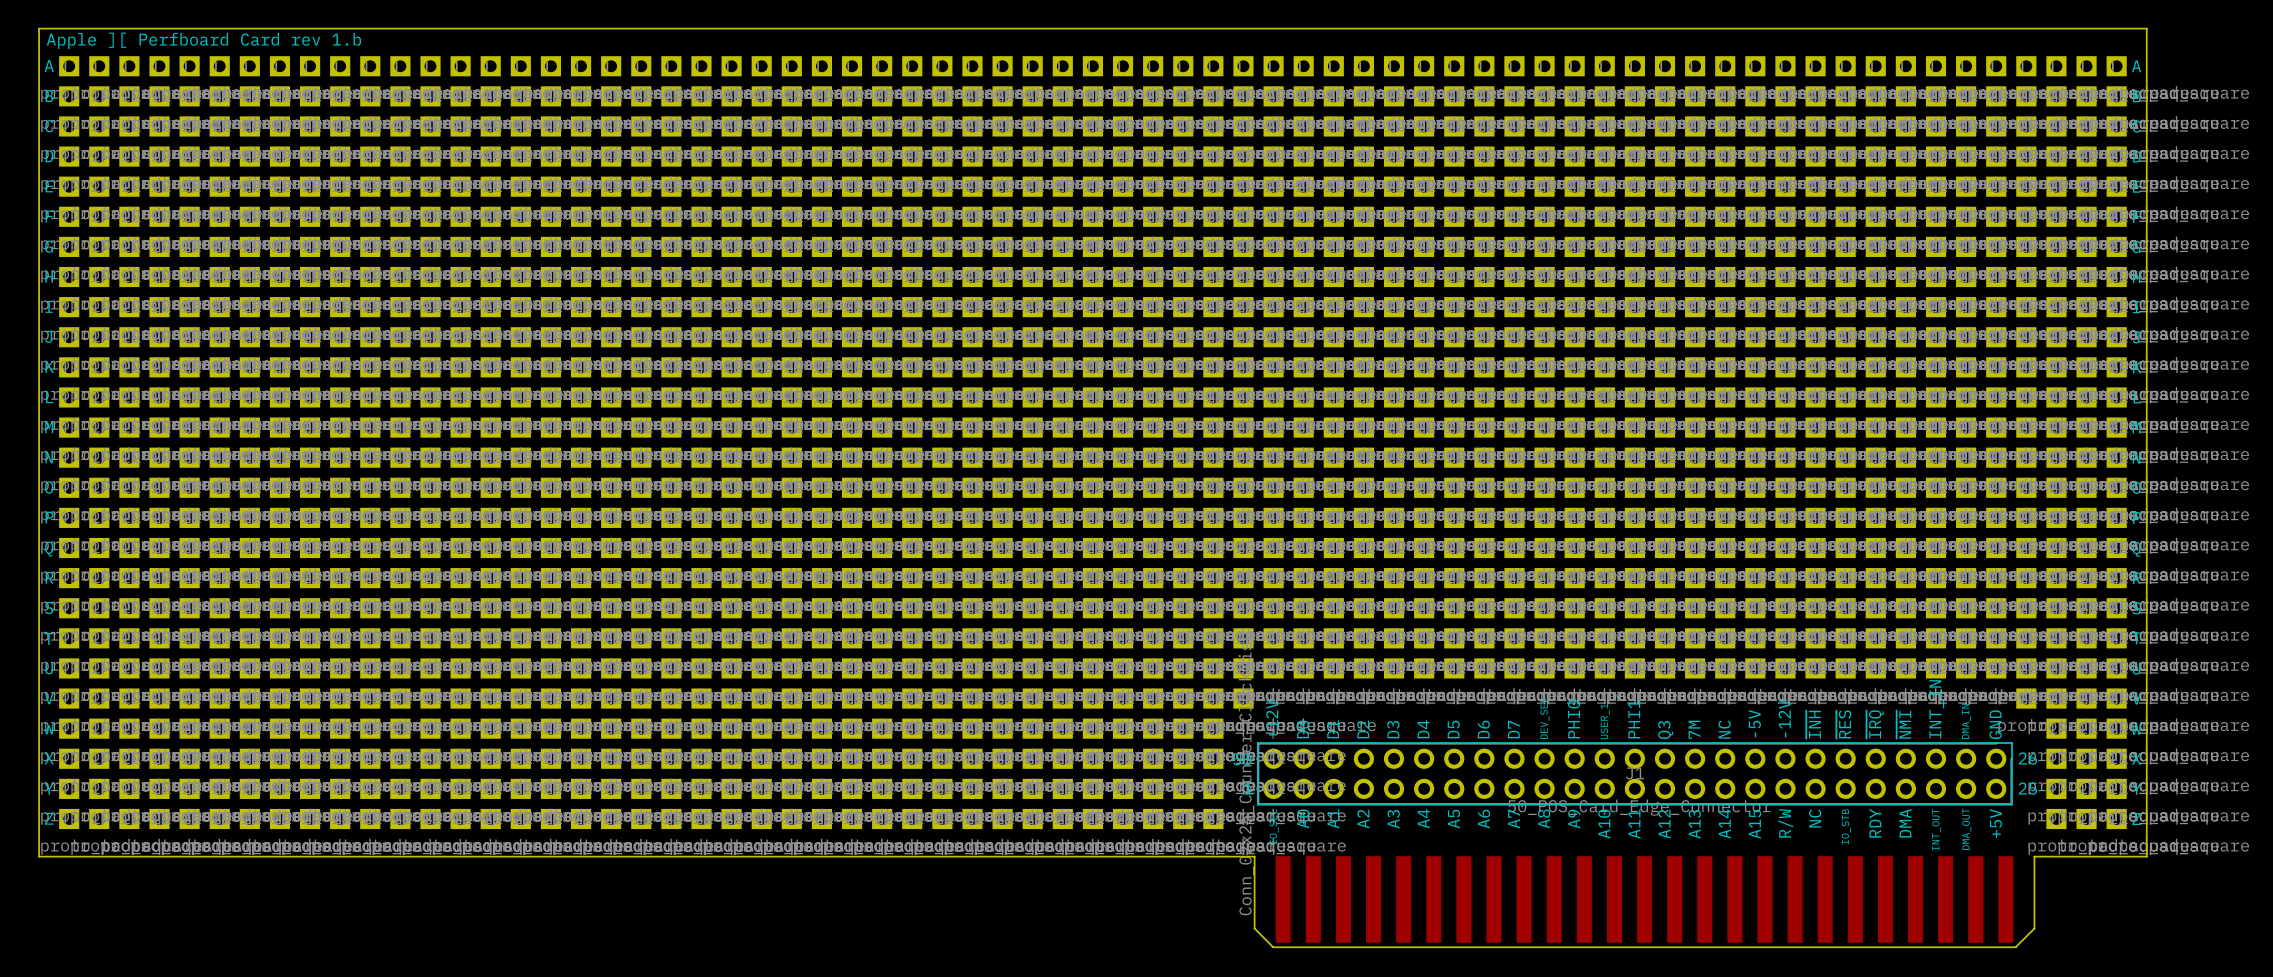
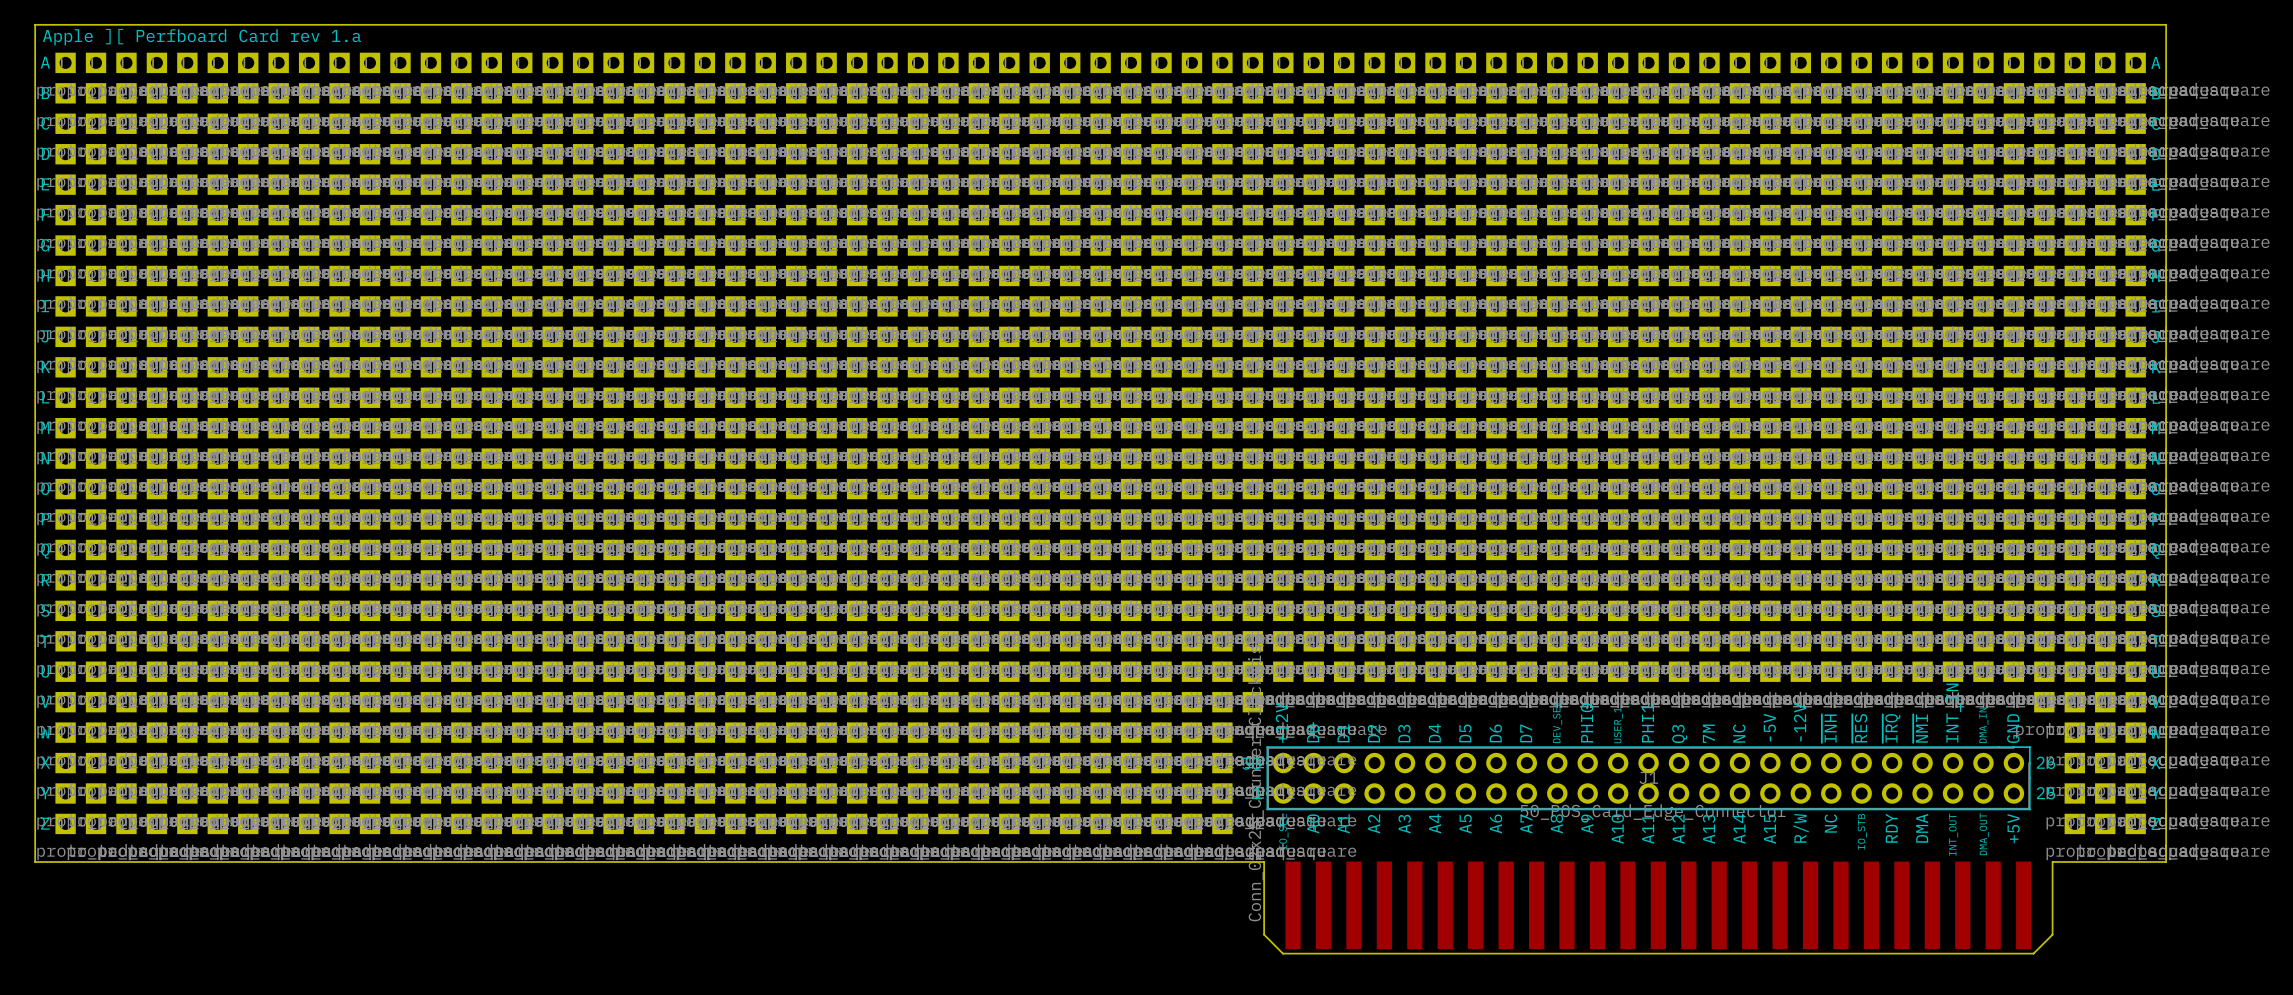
text: Apple ][ Perfboard Card rev 1.b (203, 40) -> Apple ][ Perfboard Card rev 1.a (201, 37)

